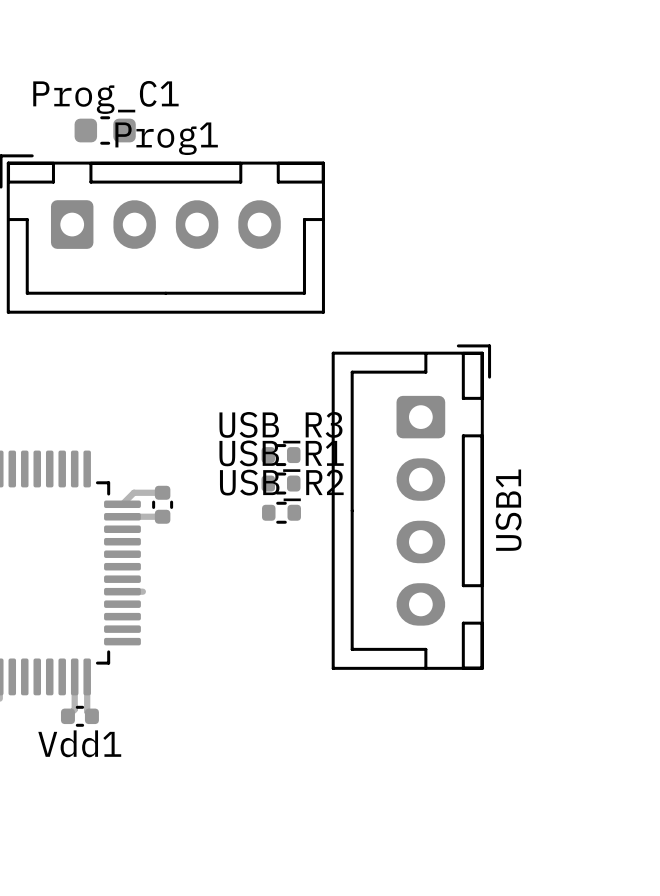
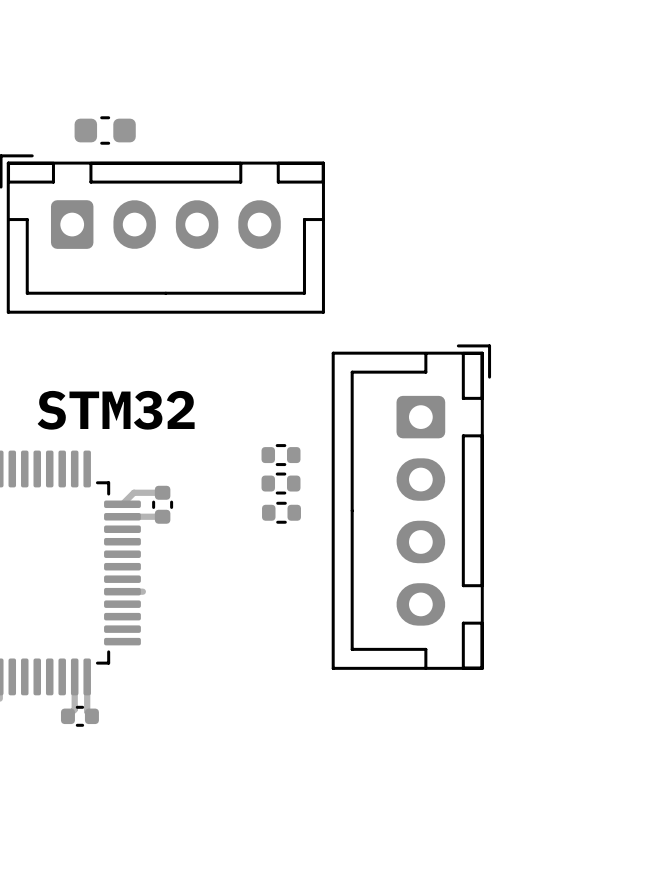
Prog_C1 name: Prog_C1 (105, 97) -> none
Prog1 name: Prog1 (166, 138) -> none
text: none -> STM32 (116, 410)
USB_R3 name: USB_R3 (280, 427) -> none
USB_R1 name: USB_R1 (281, 456) -> none
USB_R2 name: USB_R2 (281, 485) -> none
USB1 name: USB1 (508, 510) -> none
Vdd1 name: Vdd1 (79, 743) -> none

